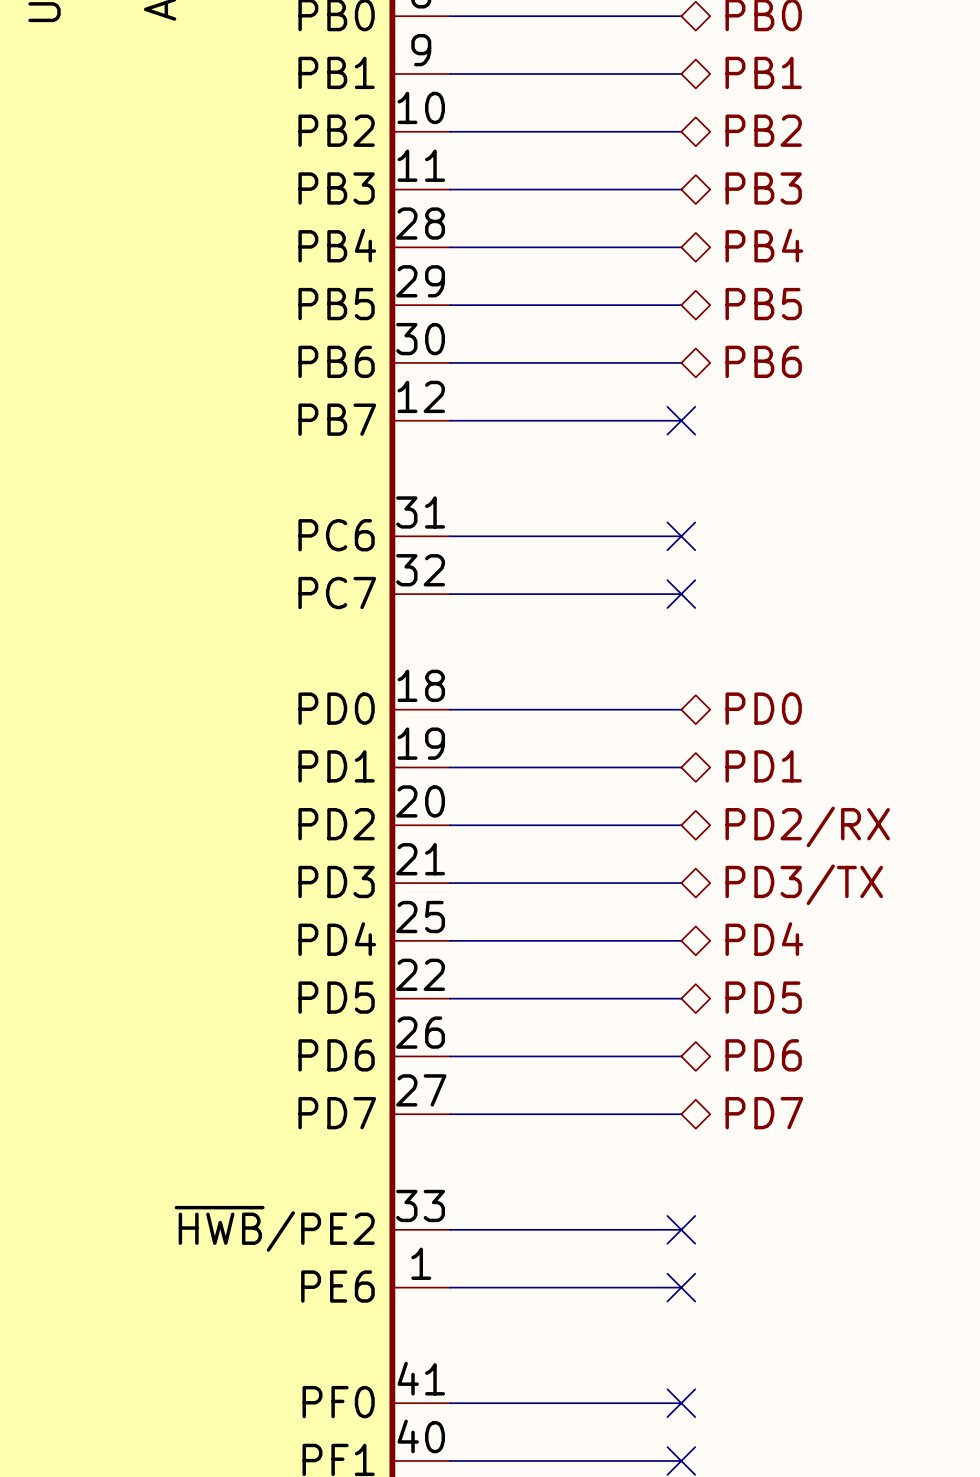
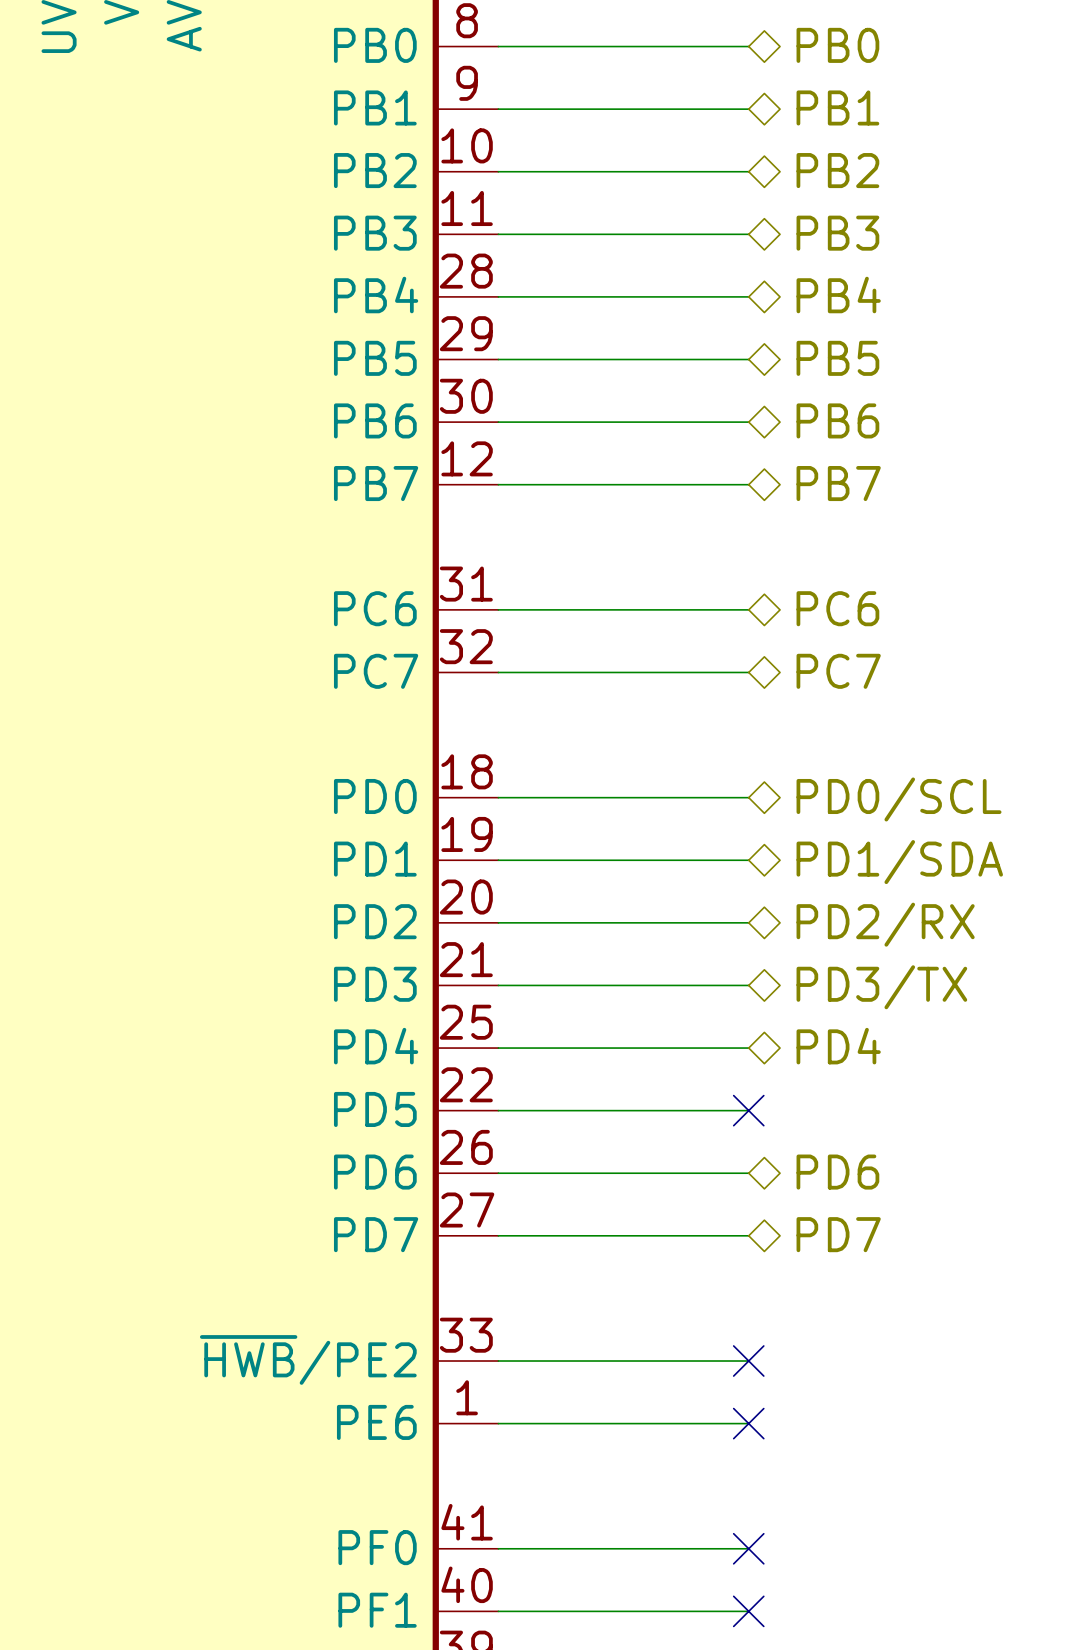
hierarchical label: none -> PB7 (838, 483)
no-connect mark: (681, 420) -> none
hierarchical label: none -> PC6 (837, 608)
no-connect mark: (681, 536) -> none
hierarchical label: none -> PC7 (838, 671)
no-connect mark: (681, 594) -> none
hierarchical label: PD0 (763, 708) -> PD0/SCL (899, 799)
hierarchical label: PD1 (763, 766) -> PD1/SDA (899, 862)
hierarchical label: PD5 (763, 997) -> none
no-connect mark: none -> (748, 1110)

